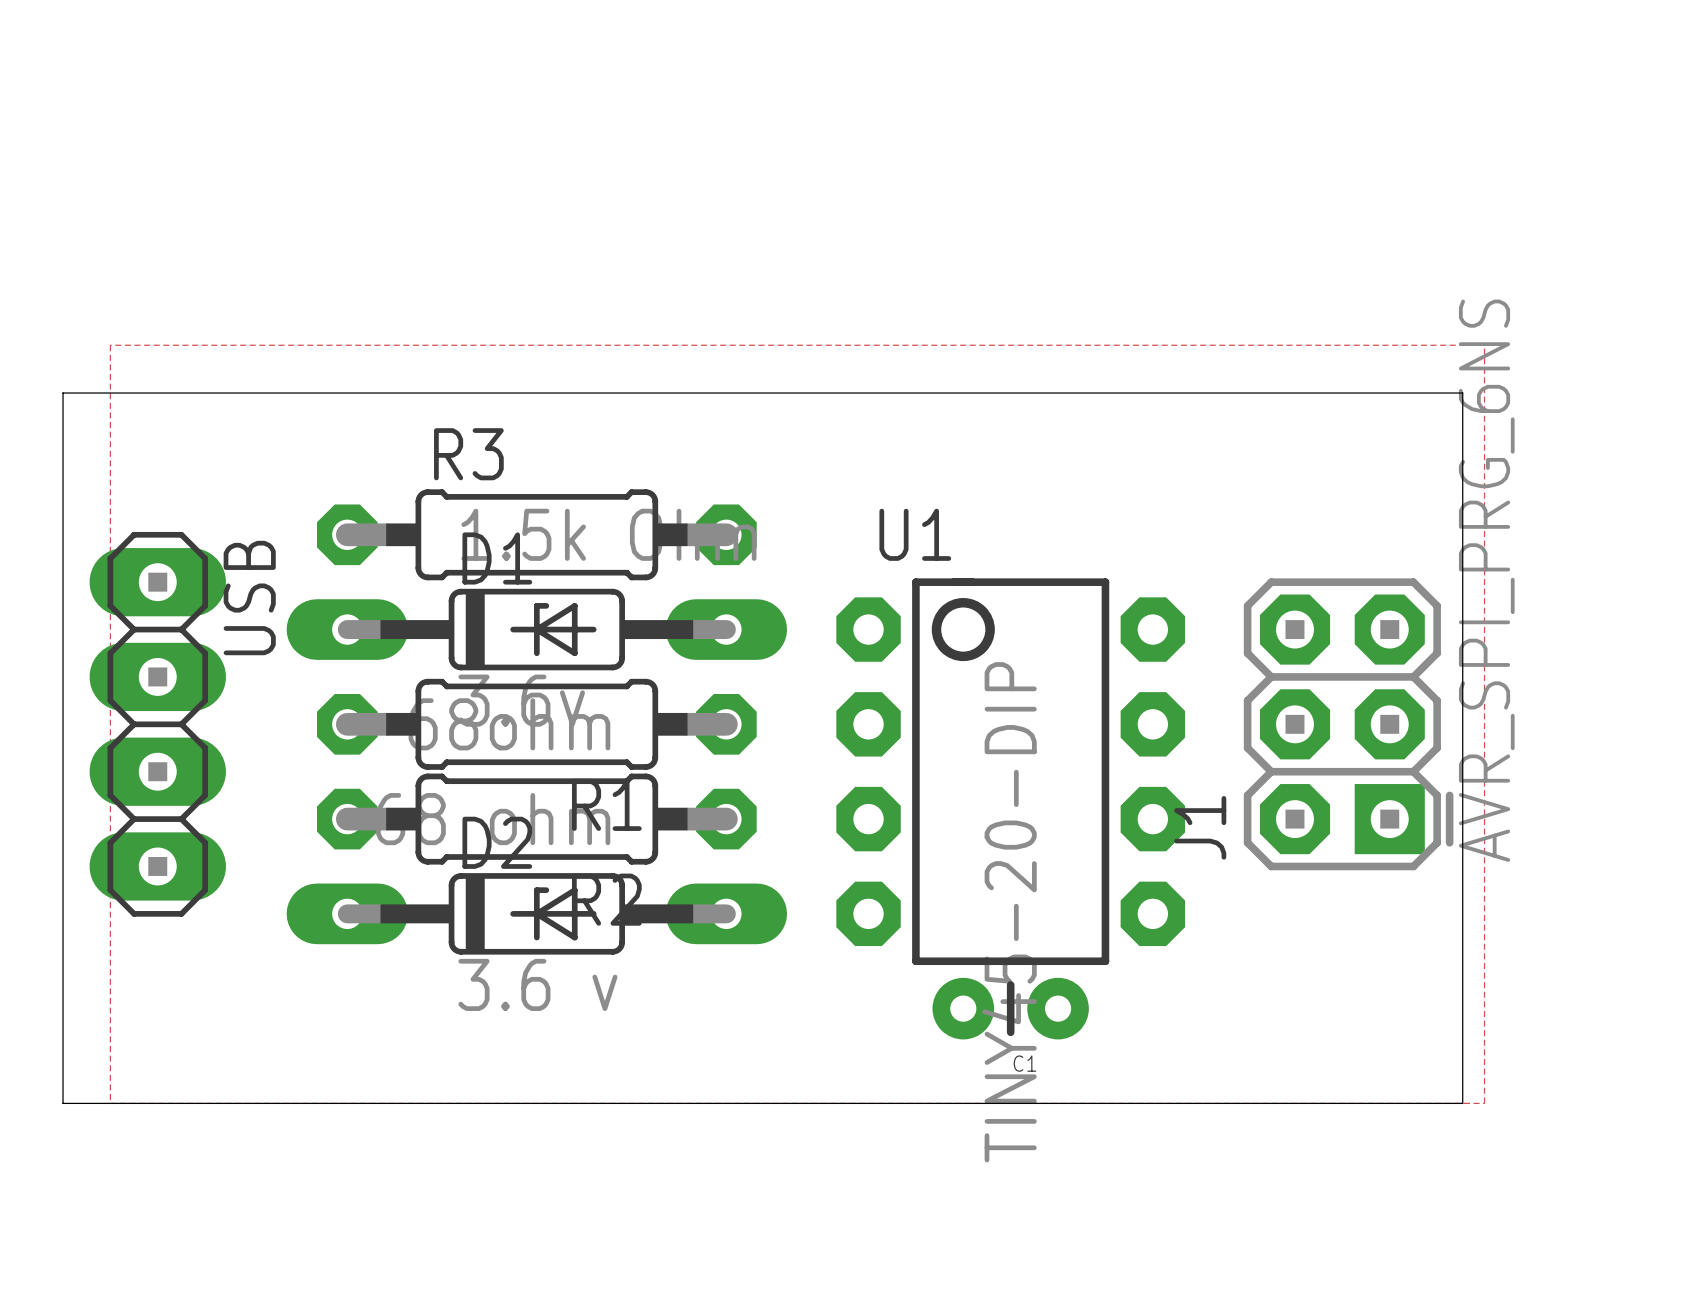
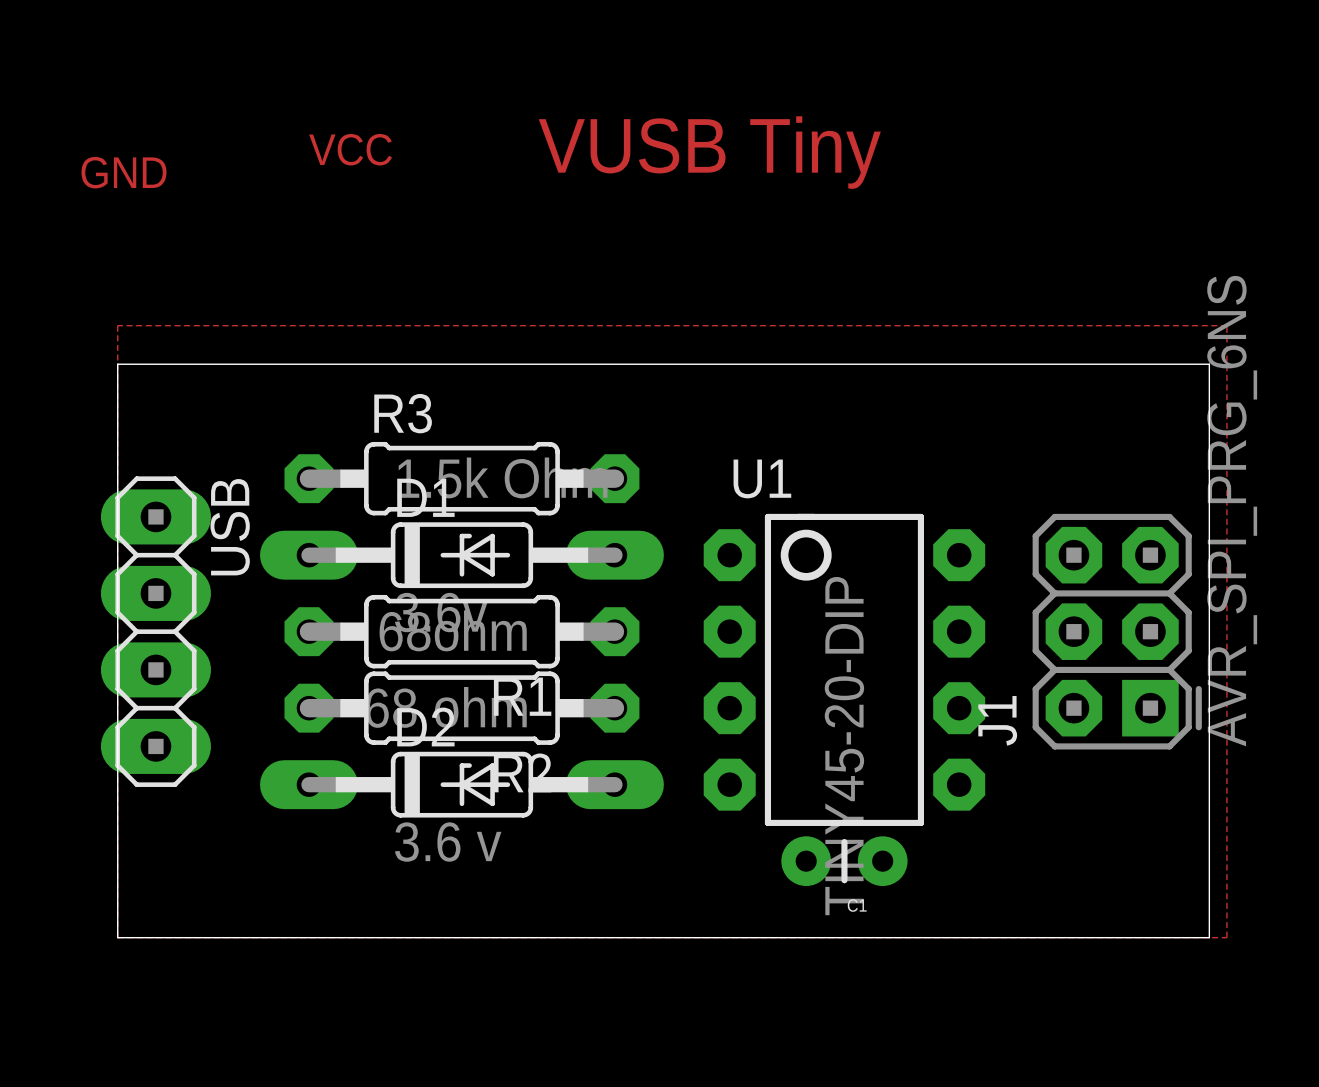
text: none -> VCC (350, 149)
text: none -> VUSB Tiny (709, 152)
text: none -> GND (123, 172)
board edge: (110, 393) (63, 393) (63, 1103) (110, 1103) -> (117, 364) (117, 937)

